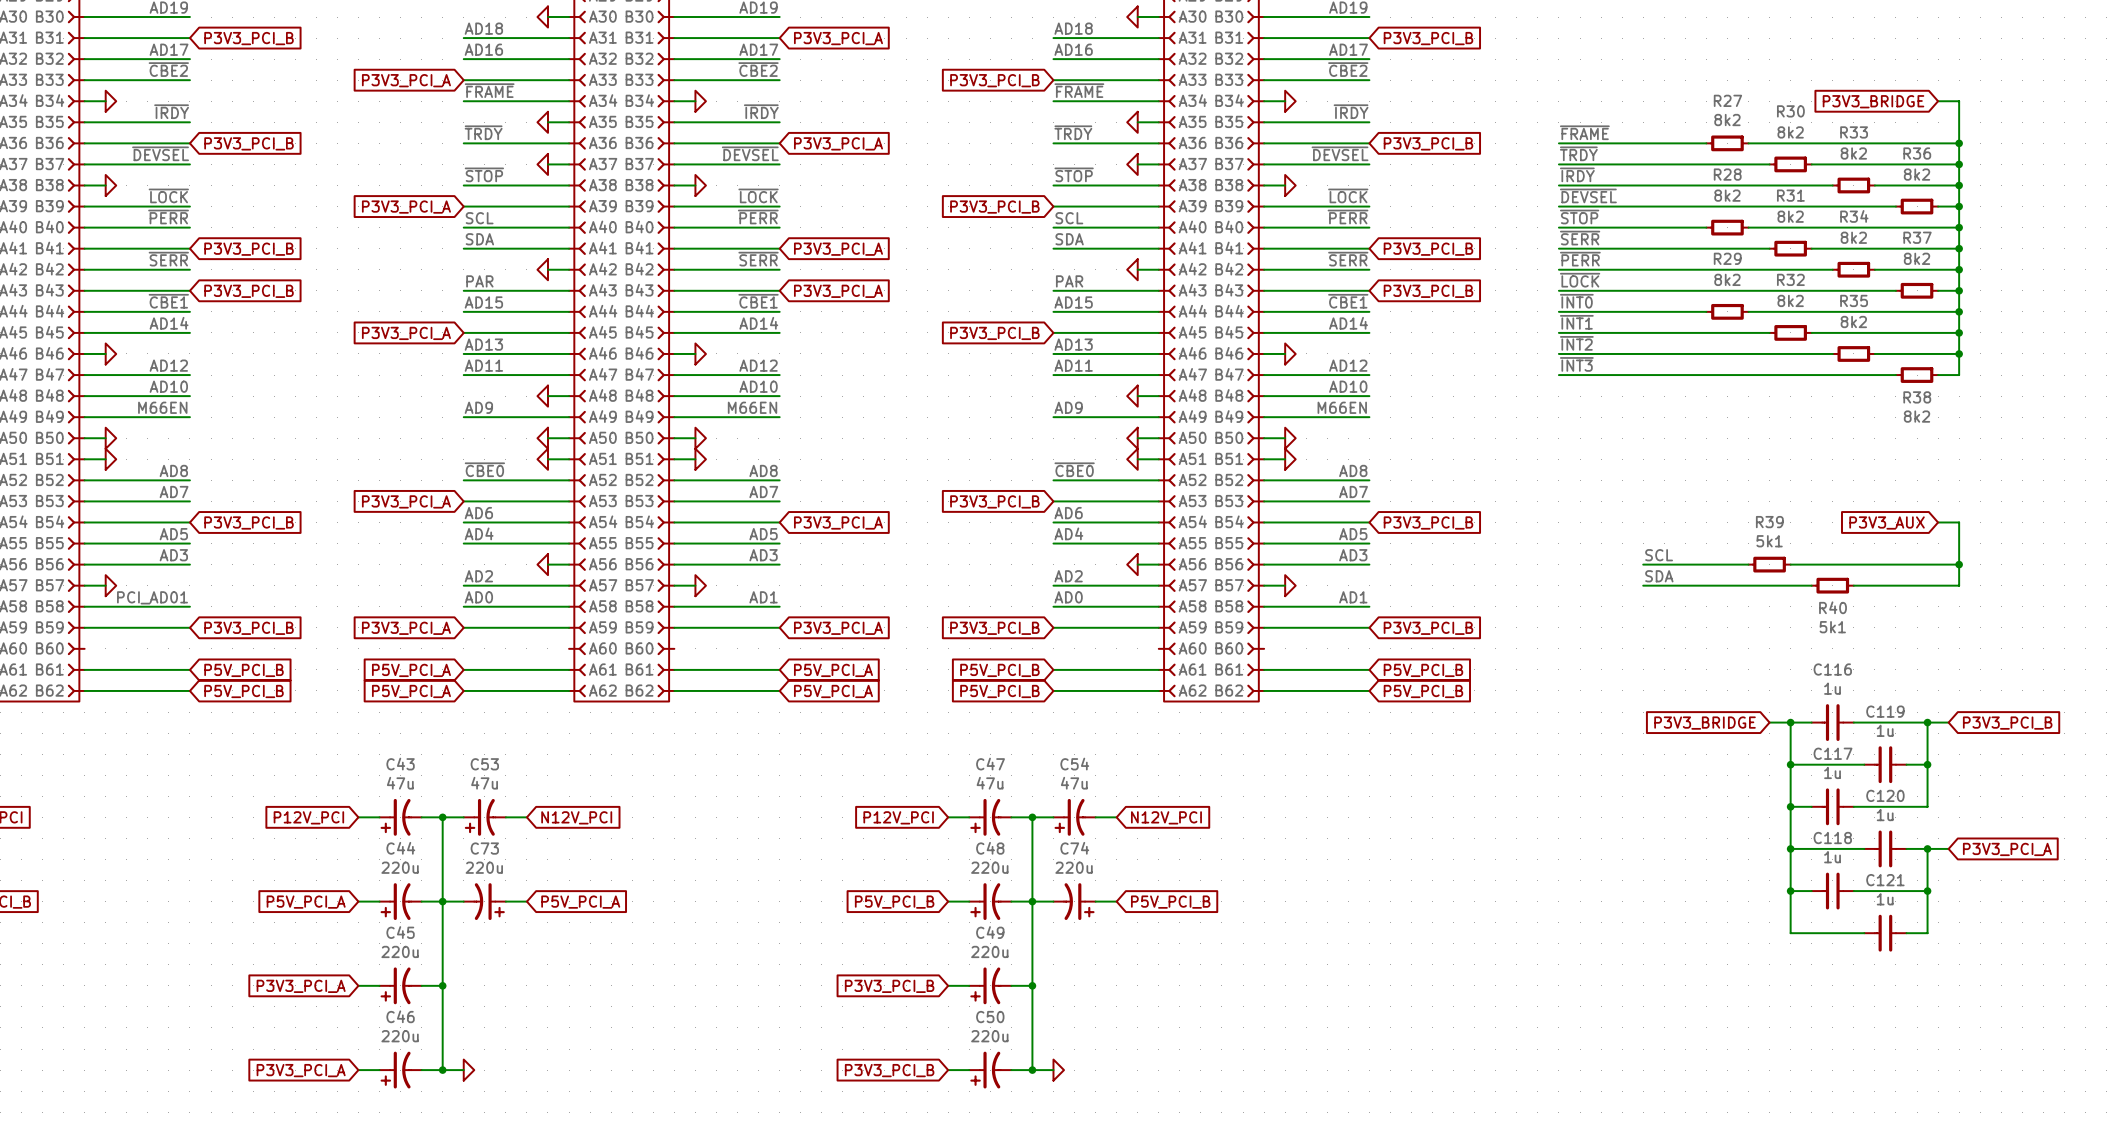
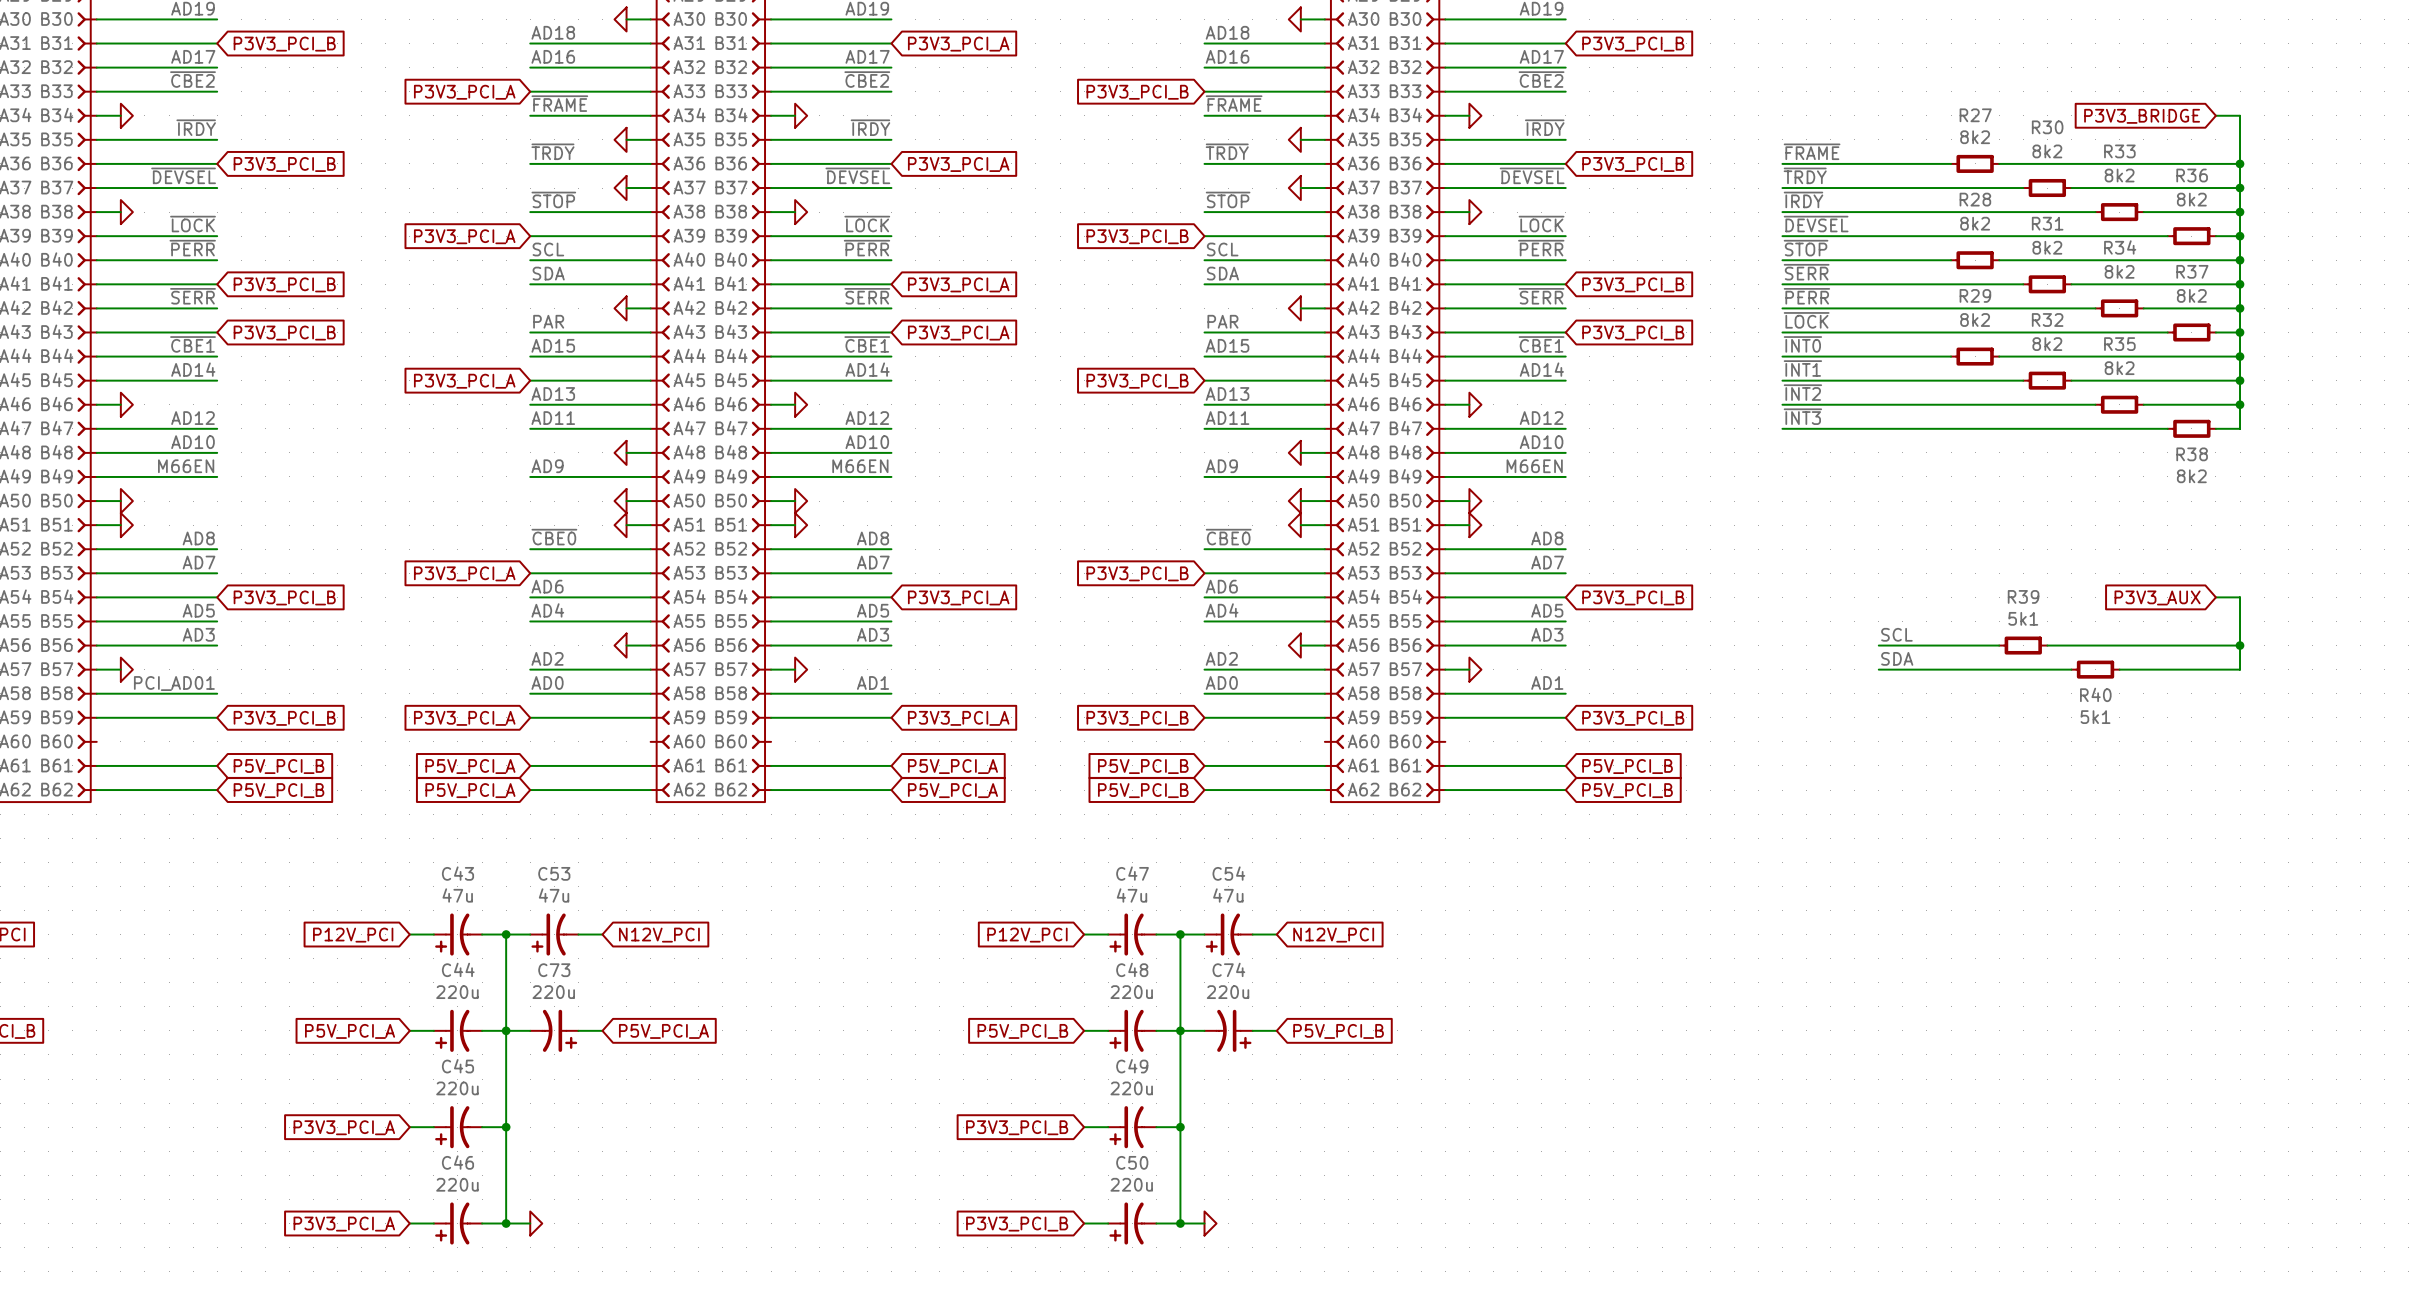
wire: (1769, 722) (1811, 722) -> none
wire: (1790, 722) (1790, 933) (1864, 933) -> none
junction: (1790, 722) -> none
C116: 1u (1832, 722) -> none
wire: (1853, 722) (1948, 722) -> none
wire: (1927, 722) (1927, 806) (1853, 806) -> none
junction: (1927, 722) -> none
global label: P3V3_BRIDGE (1705, 723) -> none
global label: P3V3_PCI_B (2007, 723) -> none
wire: (1790, 764) (1864, 764) -> none
junction: (1790, 764) -> none
C119: 1u (1885, 764) -> none
wire: (1906, 764) (1927, 764) -> none
junction: (1927, 764) -> none
wire: (1790, 806) (1811, 806) -> none
junction: (1790, 806) -> none
C117: 1u (1832, 806) -> none
wire: (1790, 848) (1864, 848) -> none
junction: (1790, 848) -> none
C120: 1u (1885, 848) -> none
wire: (1906, 848) (1948, 848) -> none
wire: (1927, 848) (1927, 933) (1906, 933) -> none
junction: (1927, 848) -> none
global label: P3V3_PCI_A (2007, 849) -> none
wire: (1790, 891) (1811, 891) -> none
junction: (1790, 891) -> none
C118: 1u (1832, 891) -> none
wire: (1853, 891) (1927, 891) -> none
junction: (1927, 891) -> none
C121: 1u (1885, 933) -> none

